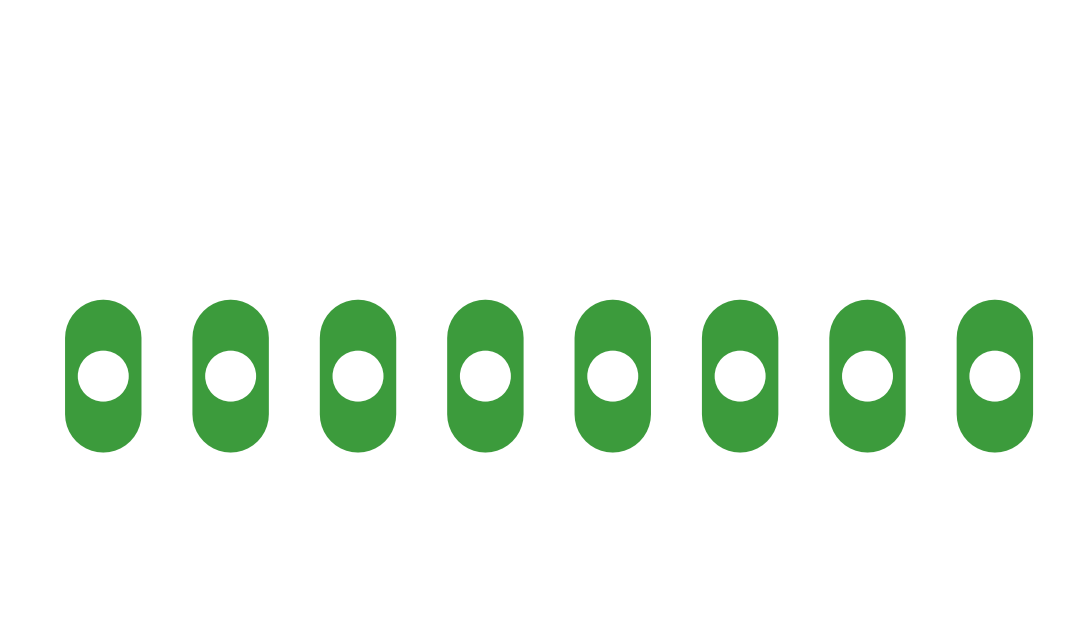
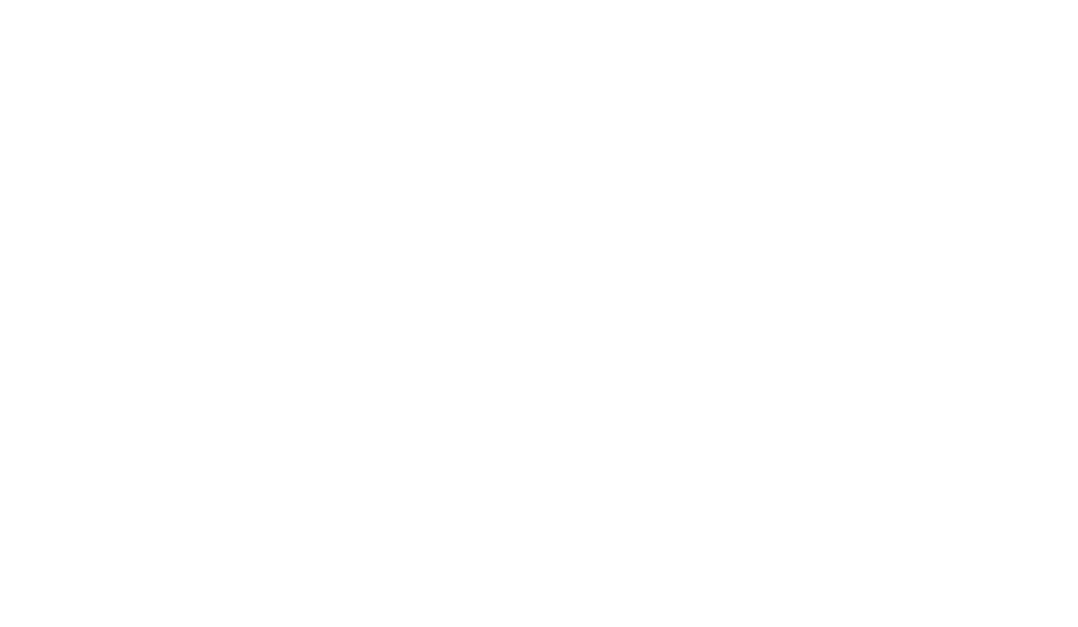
part: (549, 376) -> none

